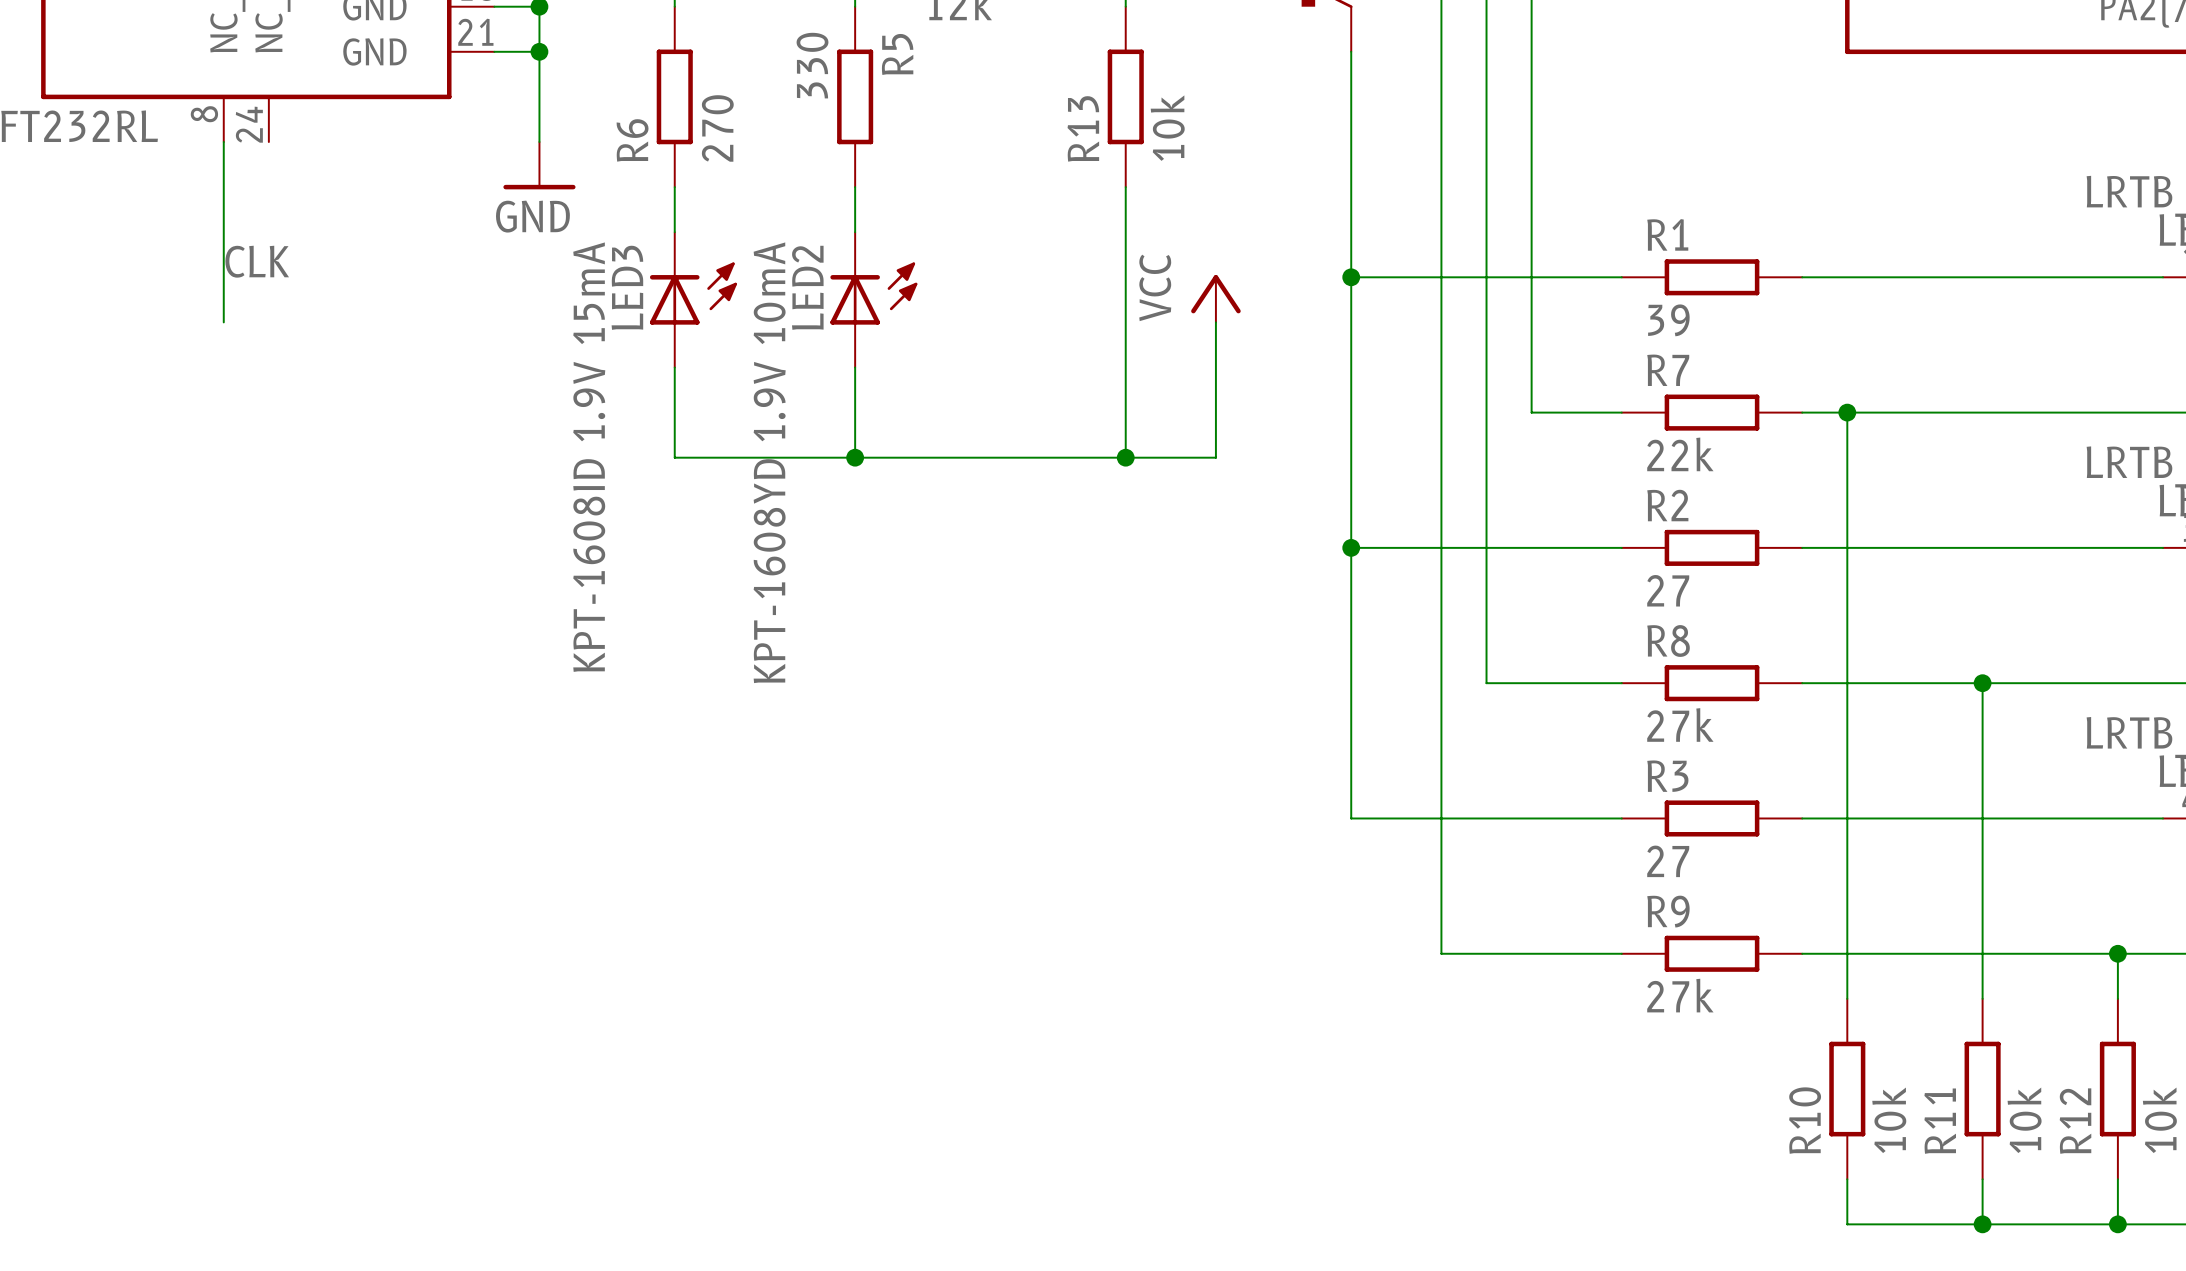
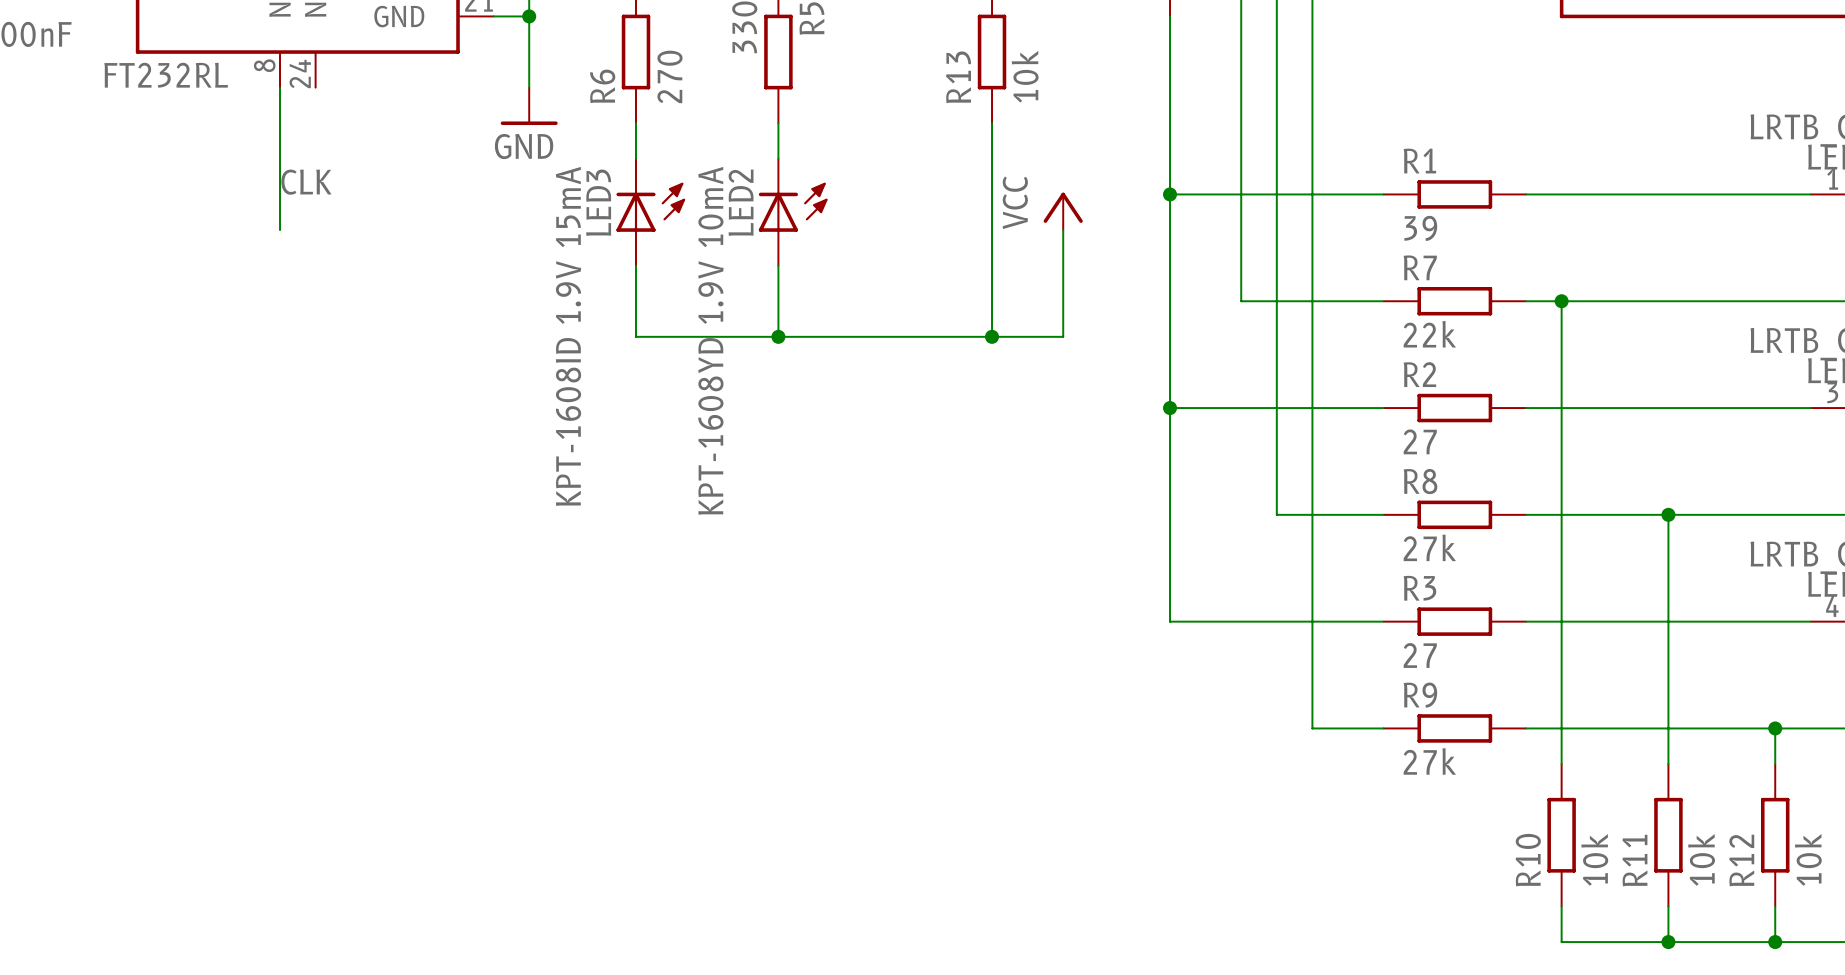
wire: (1441, 412) (1441, 953) (1531, 953) -> (1241, 301) (1312, 301) (1312, 728)

